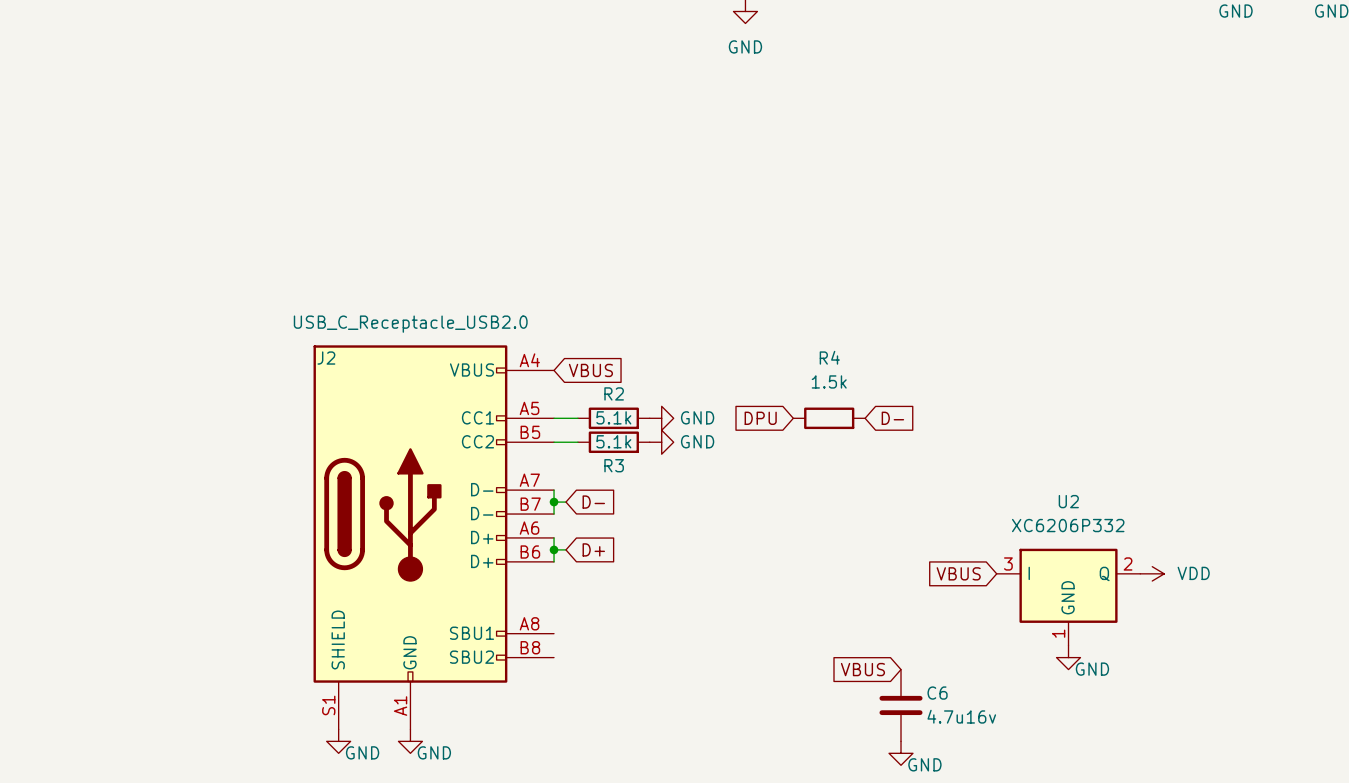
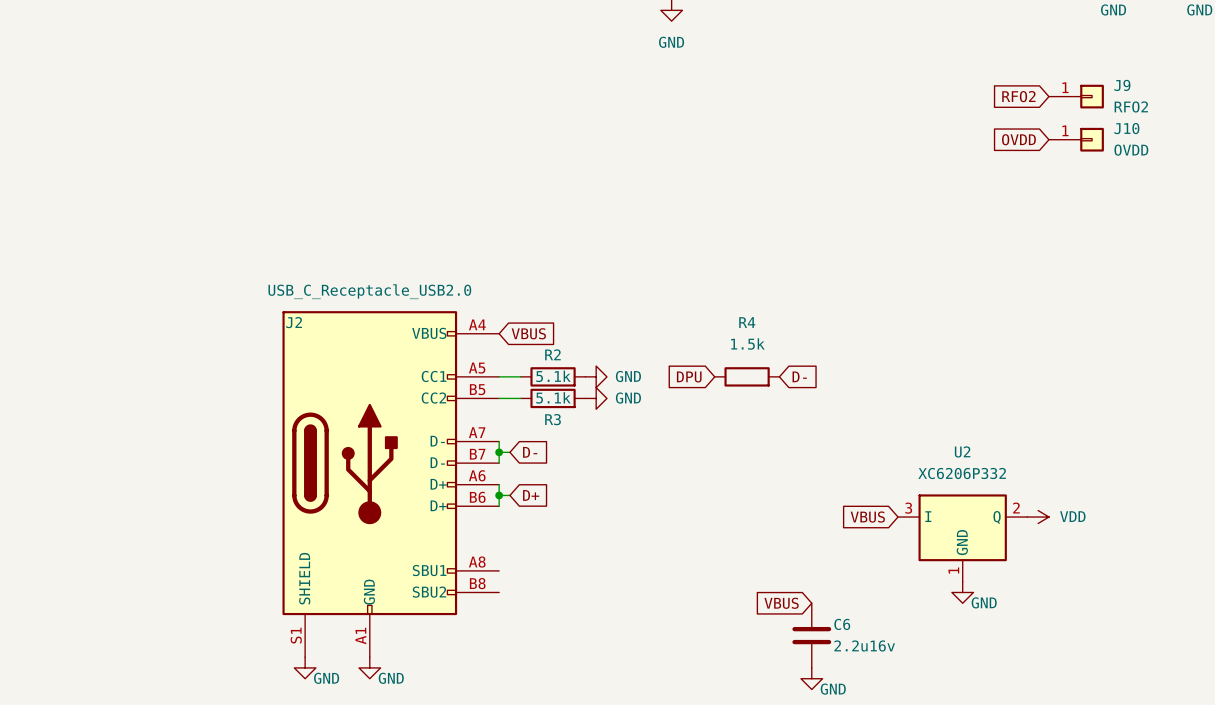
global label: none -> RFO2 (1018, 96)
J9: none -> RFO2 (1076, 96)
global label: none -> OVDD (1018, 139)
J10: none -> OVDD (1076, 139)
C6 value: 4.7u16v (961, 716) -> 2.2u16v (864, 645)

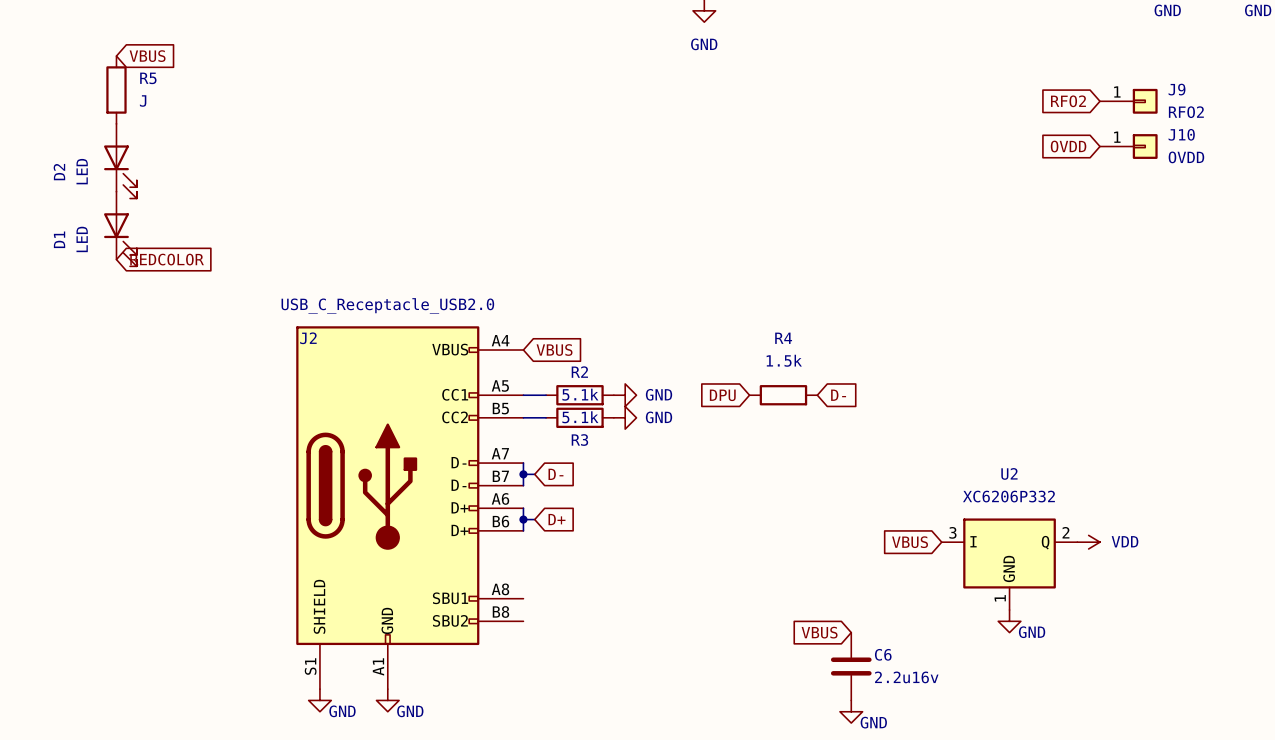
global label: none -> VBUS (147, 56)
R5: none -> J (116, 89)
D2: none -> LED (120, 161)
D1: none -> LED (120, 229)
global label: none -> REDCOLOR (167, 259)

